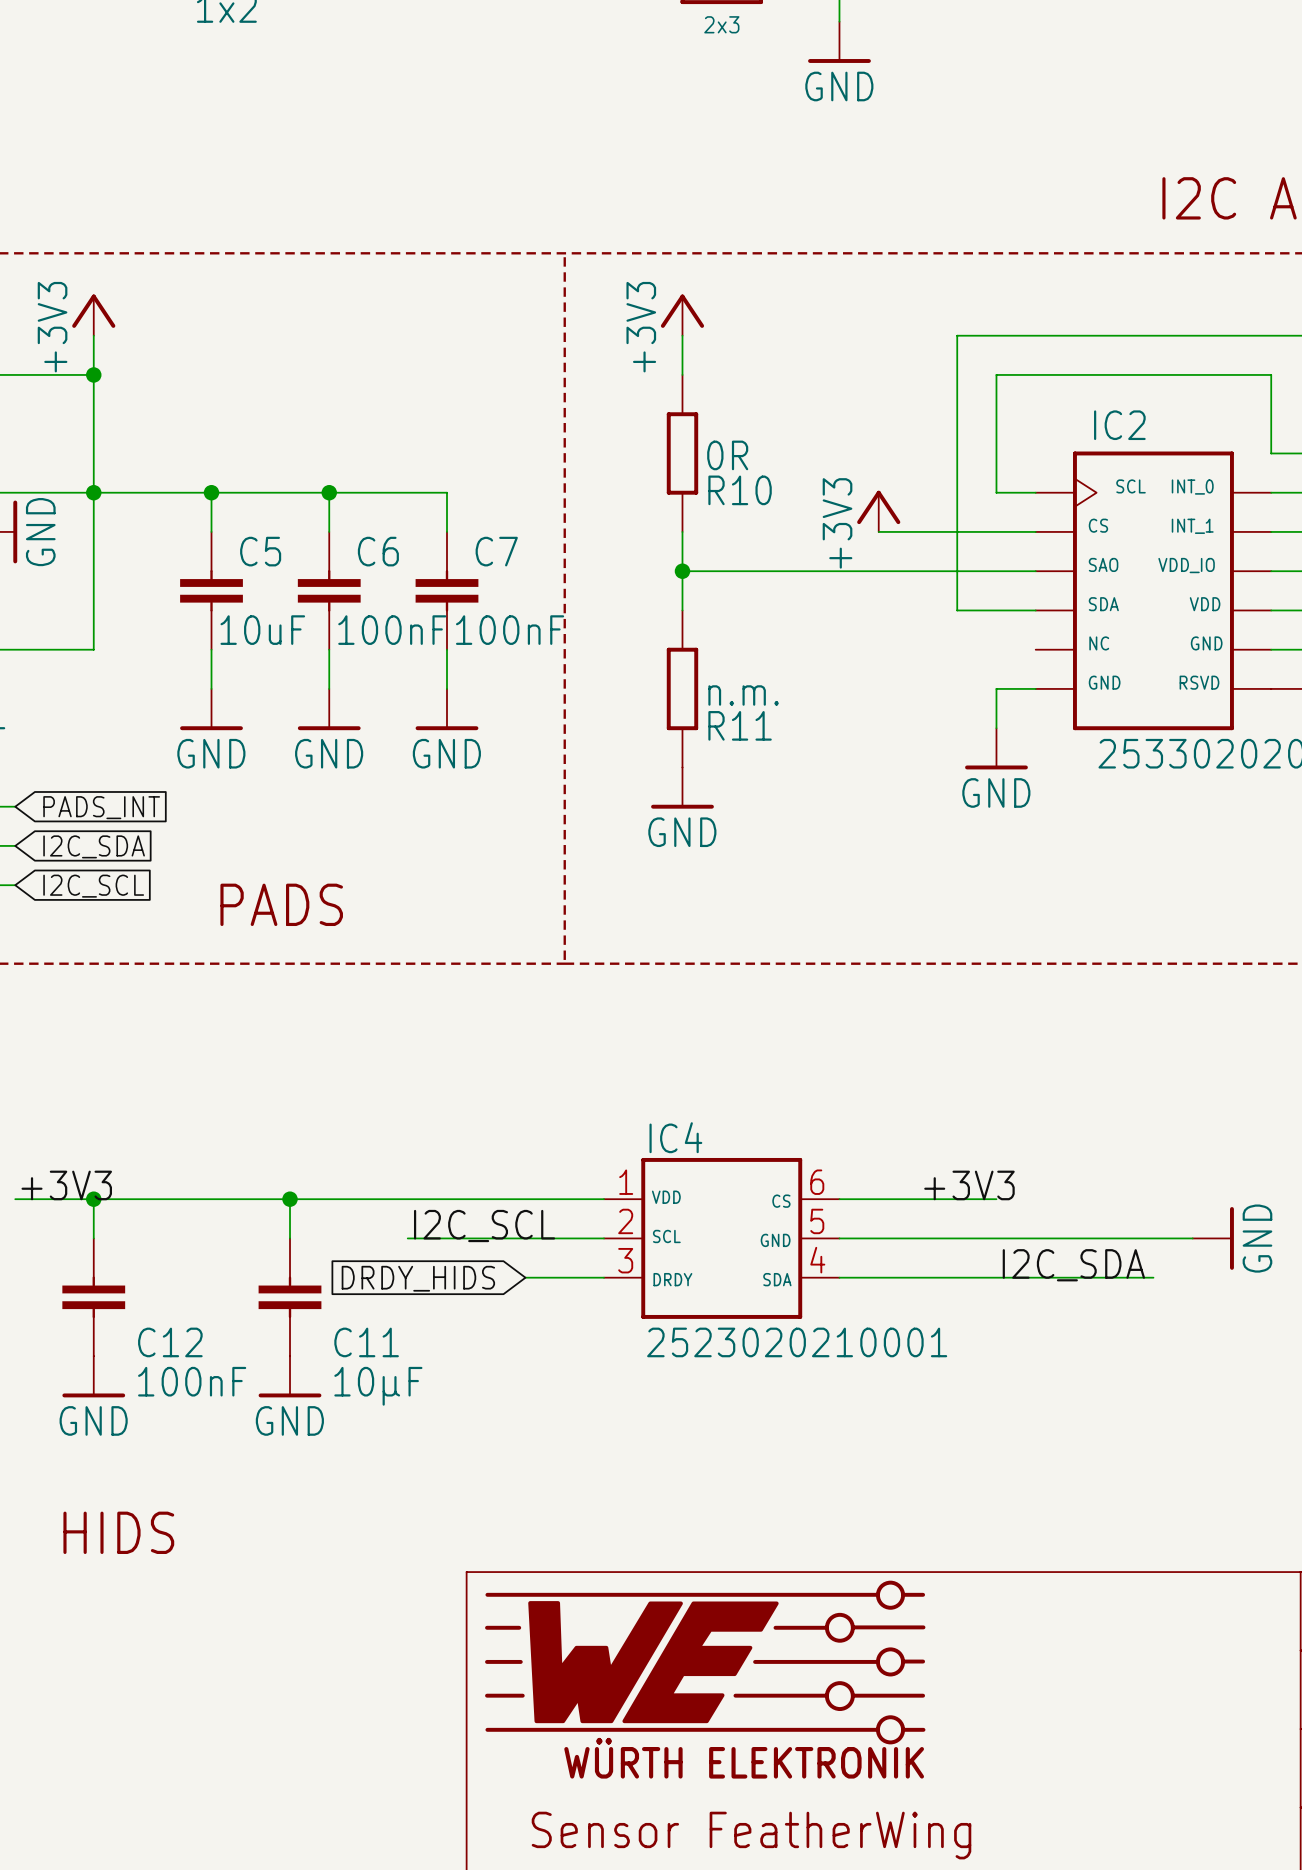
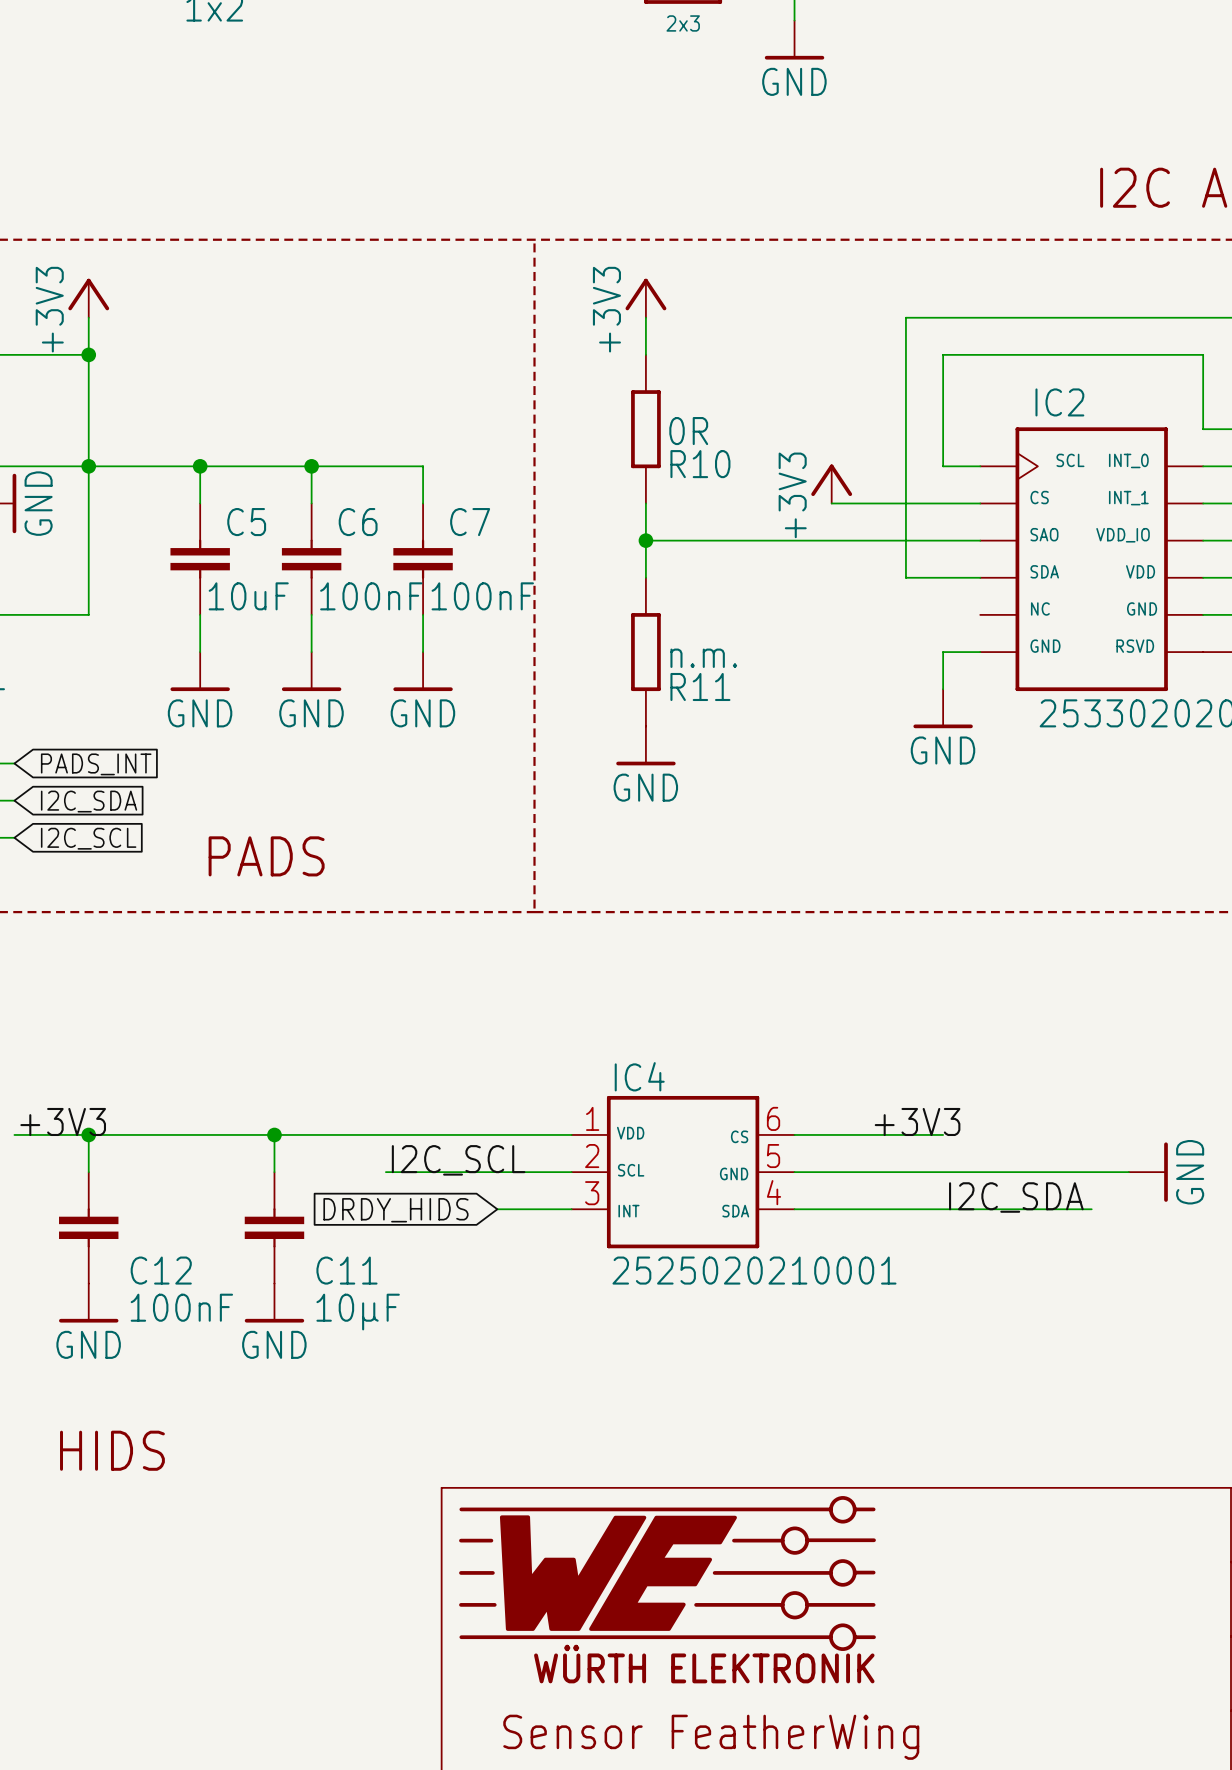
IC4 text: DRDY (672, 1279) -> INT (628, 1211)
IC4 value: 2523020210001 (797, 1342) -> 2525020210001 (754, 1270)

